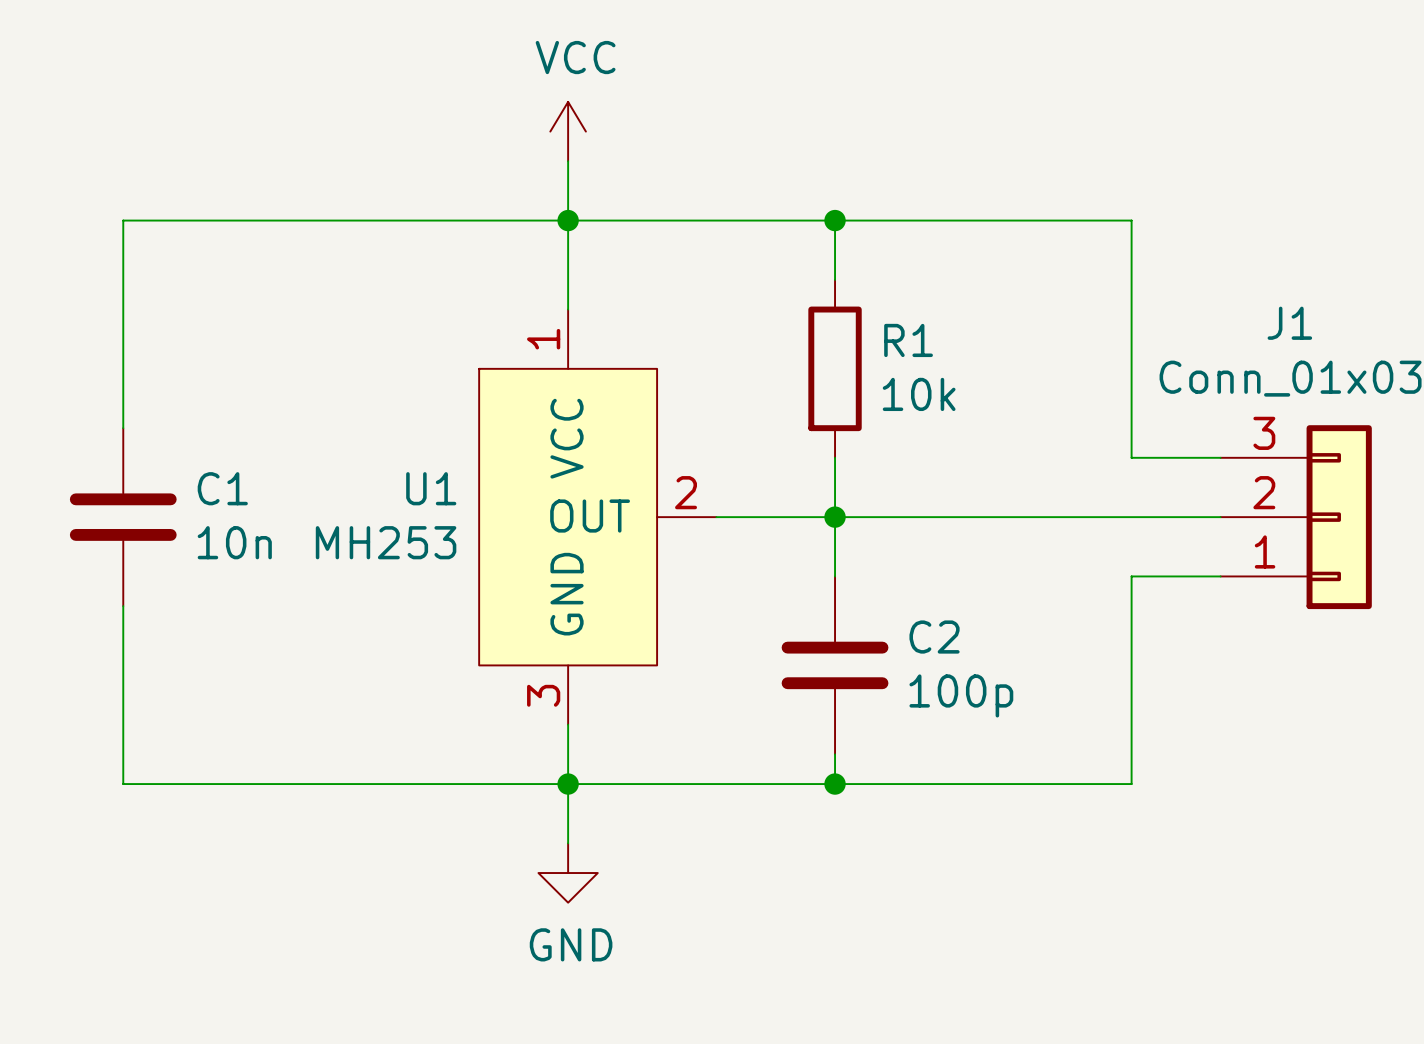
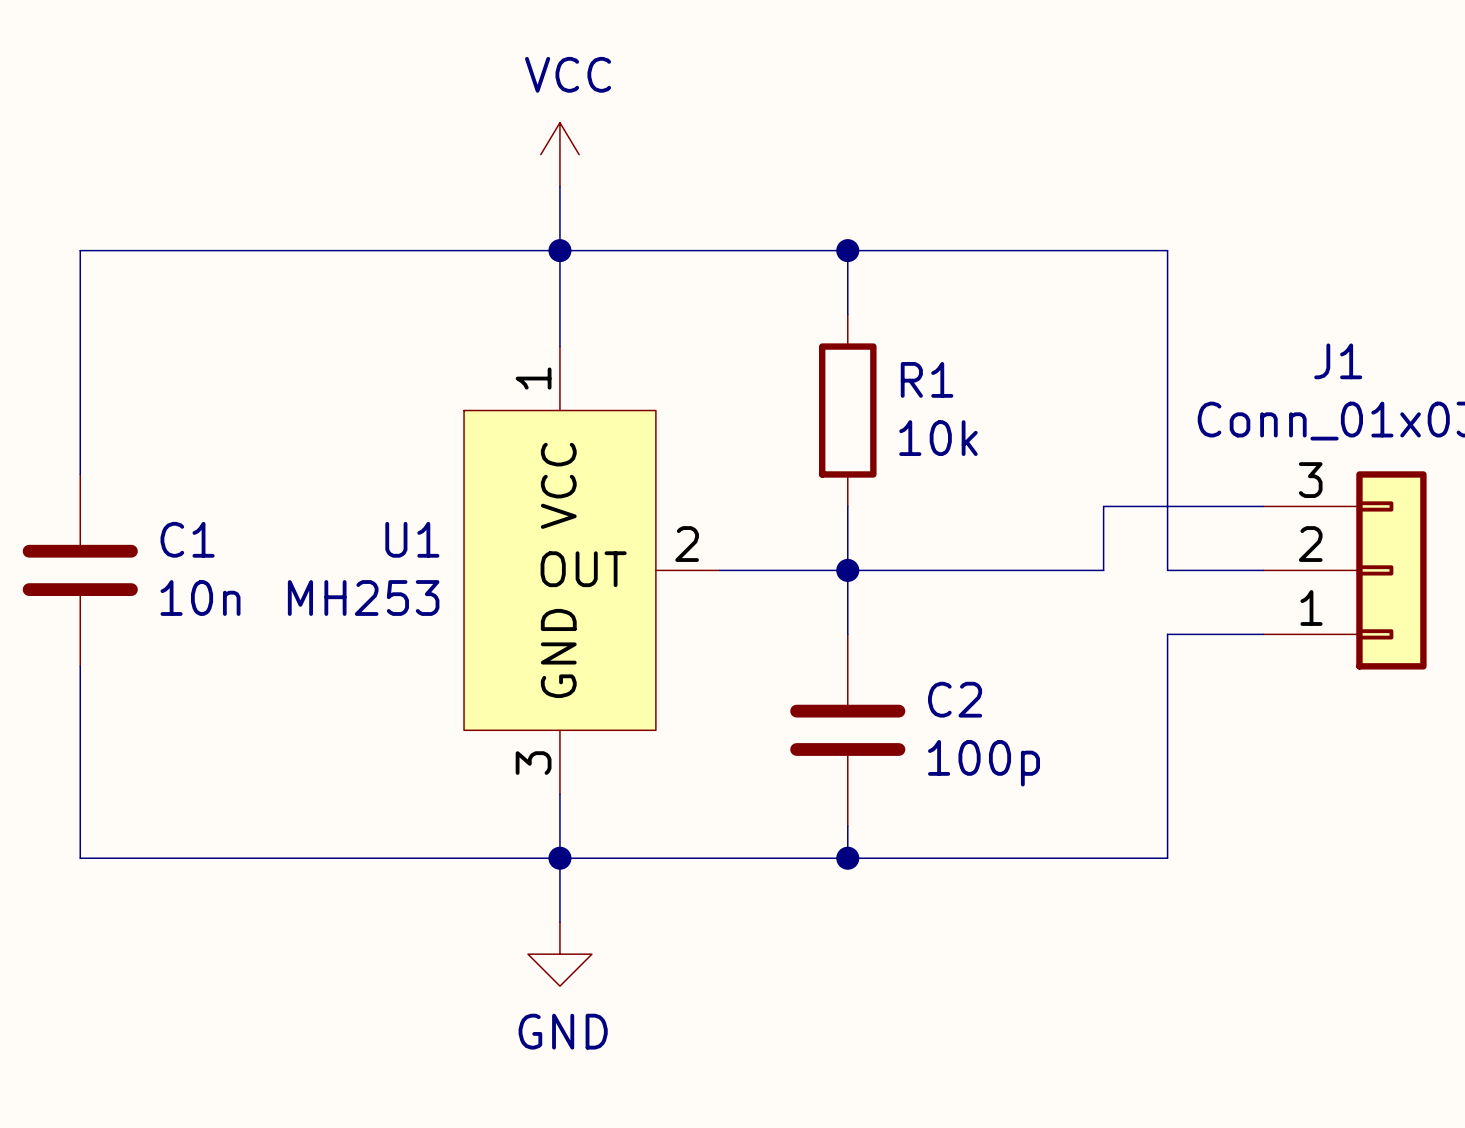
wire: (1072, 517) (1131, 517) -> (1103, 570) (1103, 506) (1167, 506) (1167, 570)

